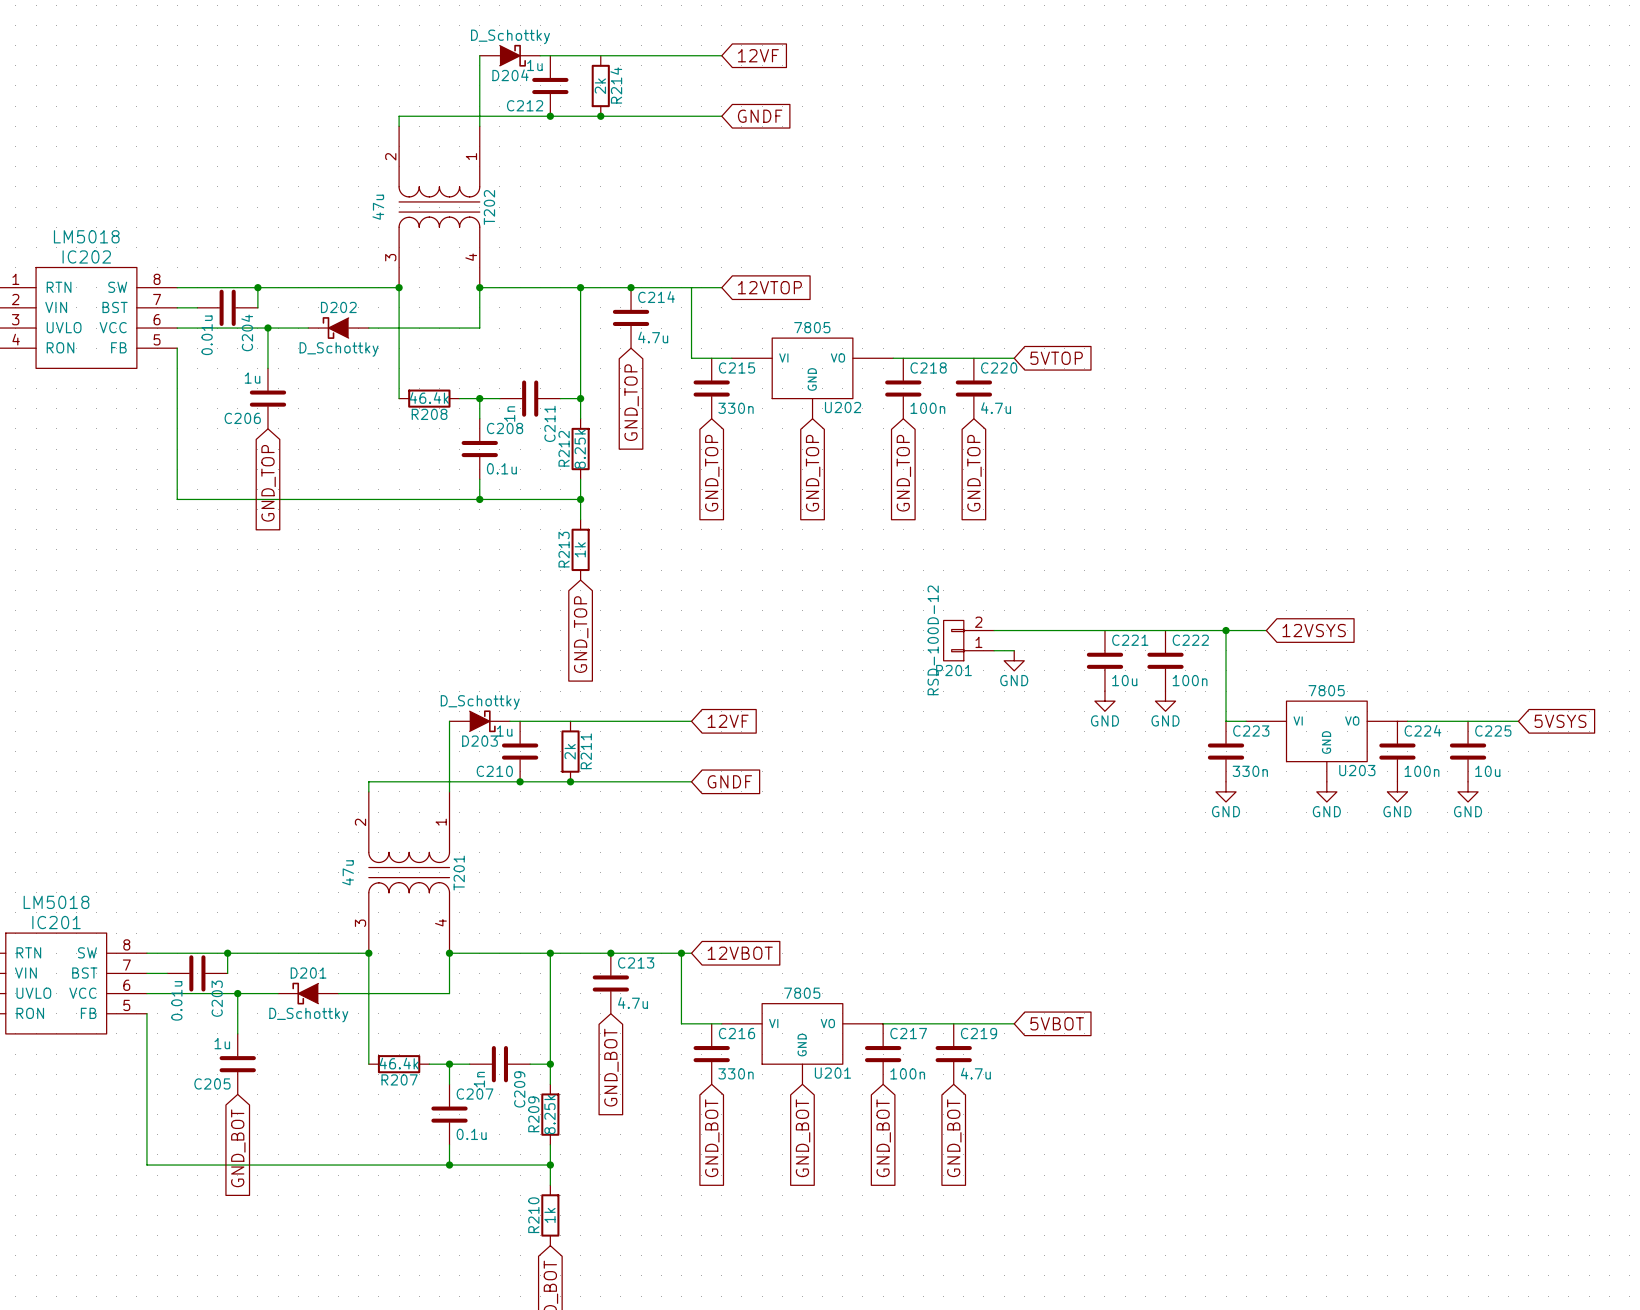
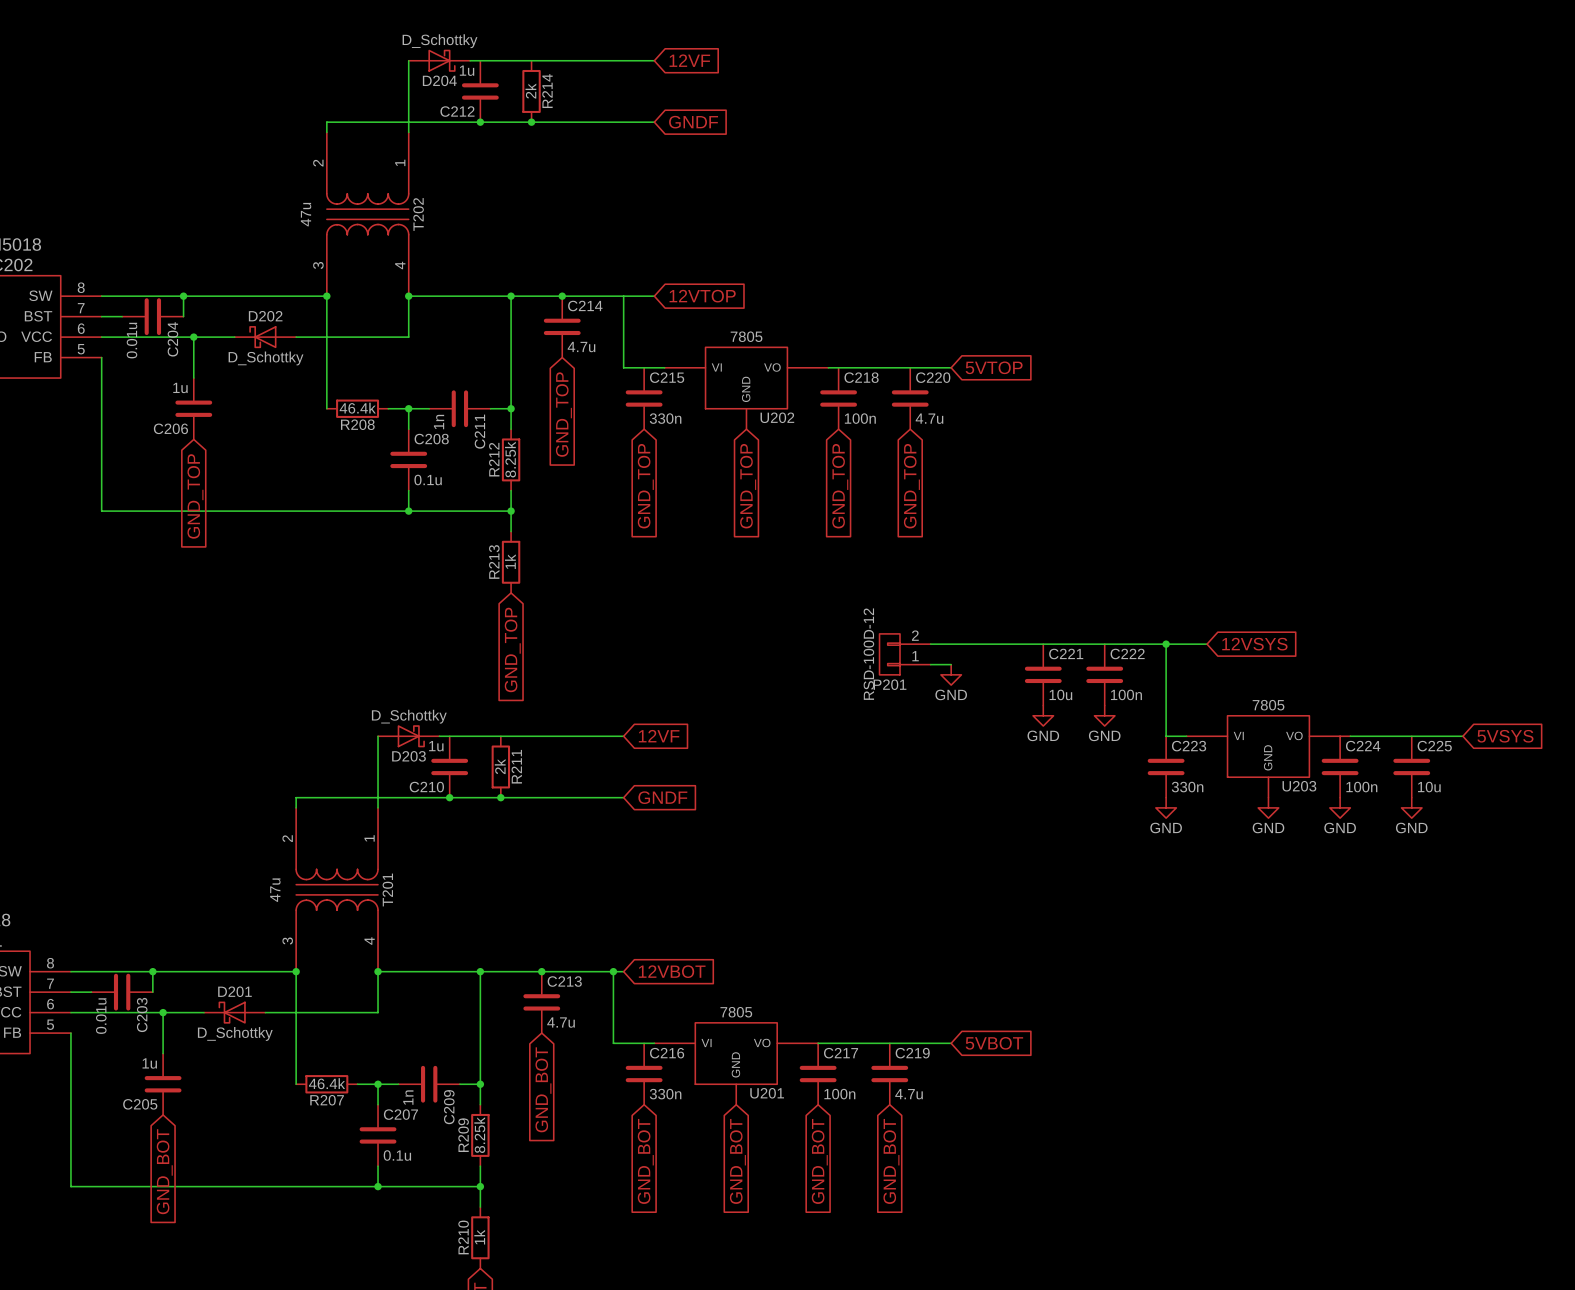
D204 symbol: [479, 44, 541, 67] -> [408, 49, 471, 72]
D202 symbol: [308, 317, 369, 339] -> [234, 326, 297, 349]
D203 symbol: [449, 710, 511, 733] -> [378, 725, 440, 748]
D201 symbol: [278, 982, 339, 1005] -> [204, 1001, 266, 1024]

